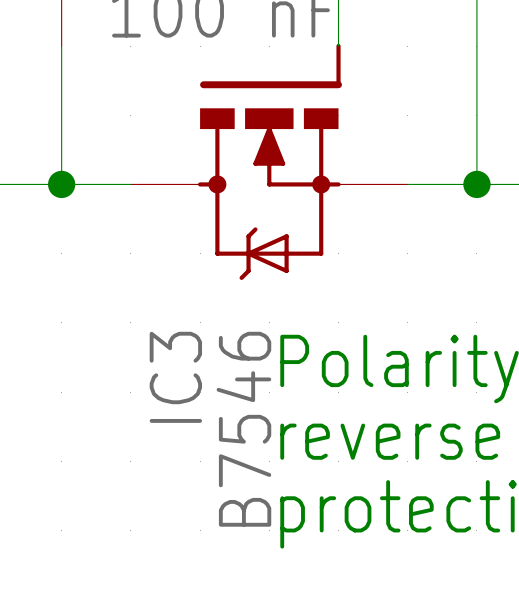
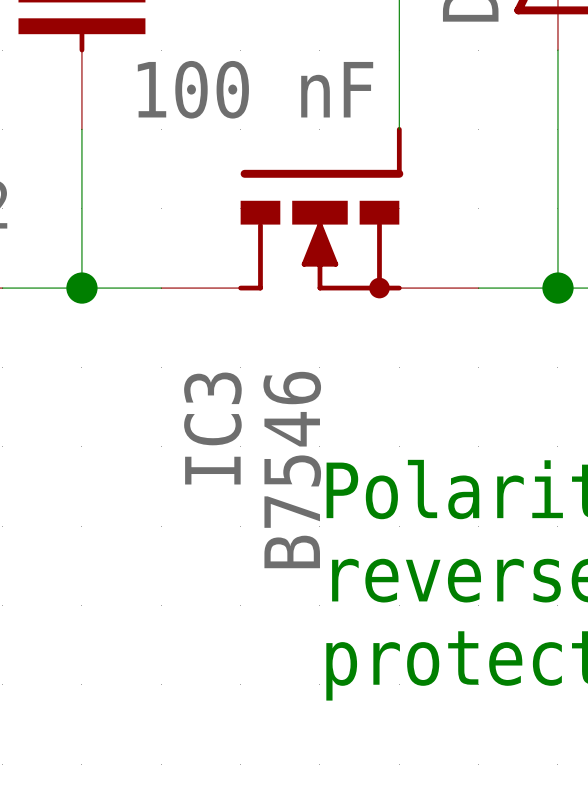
IC3 symbol: [130, 43, 408, 280] -> [161, 127, 479, 299]

